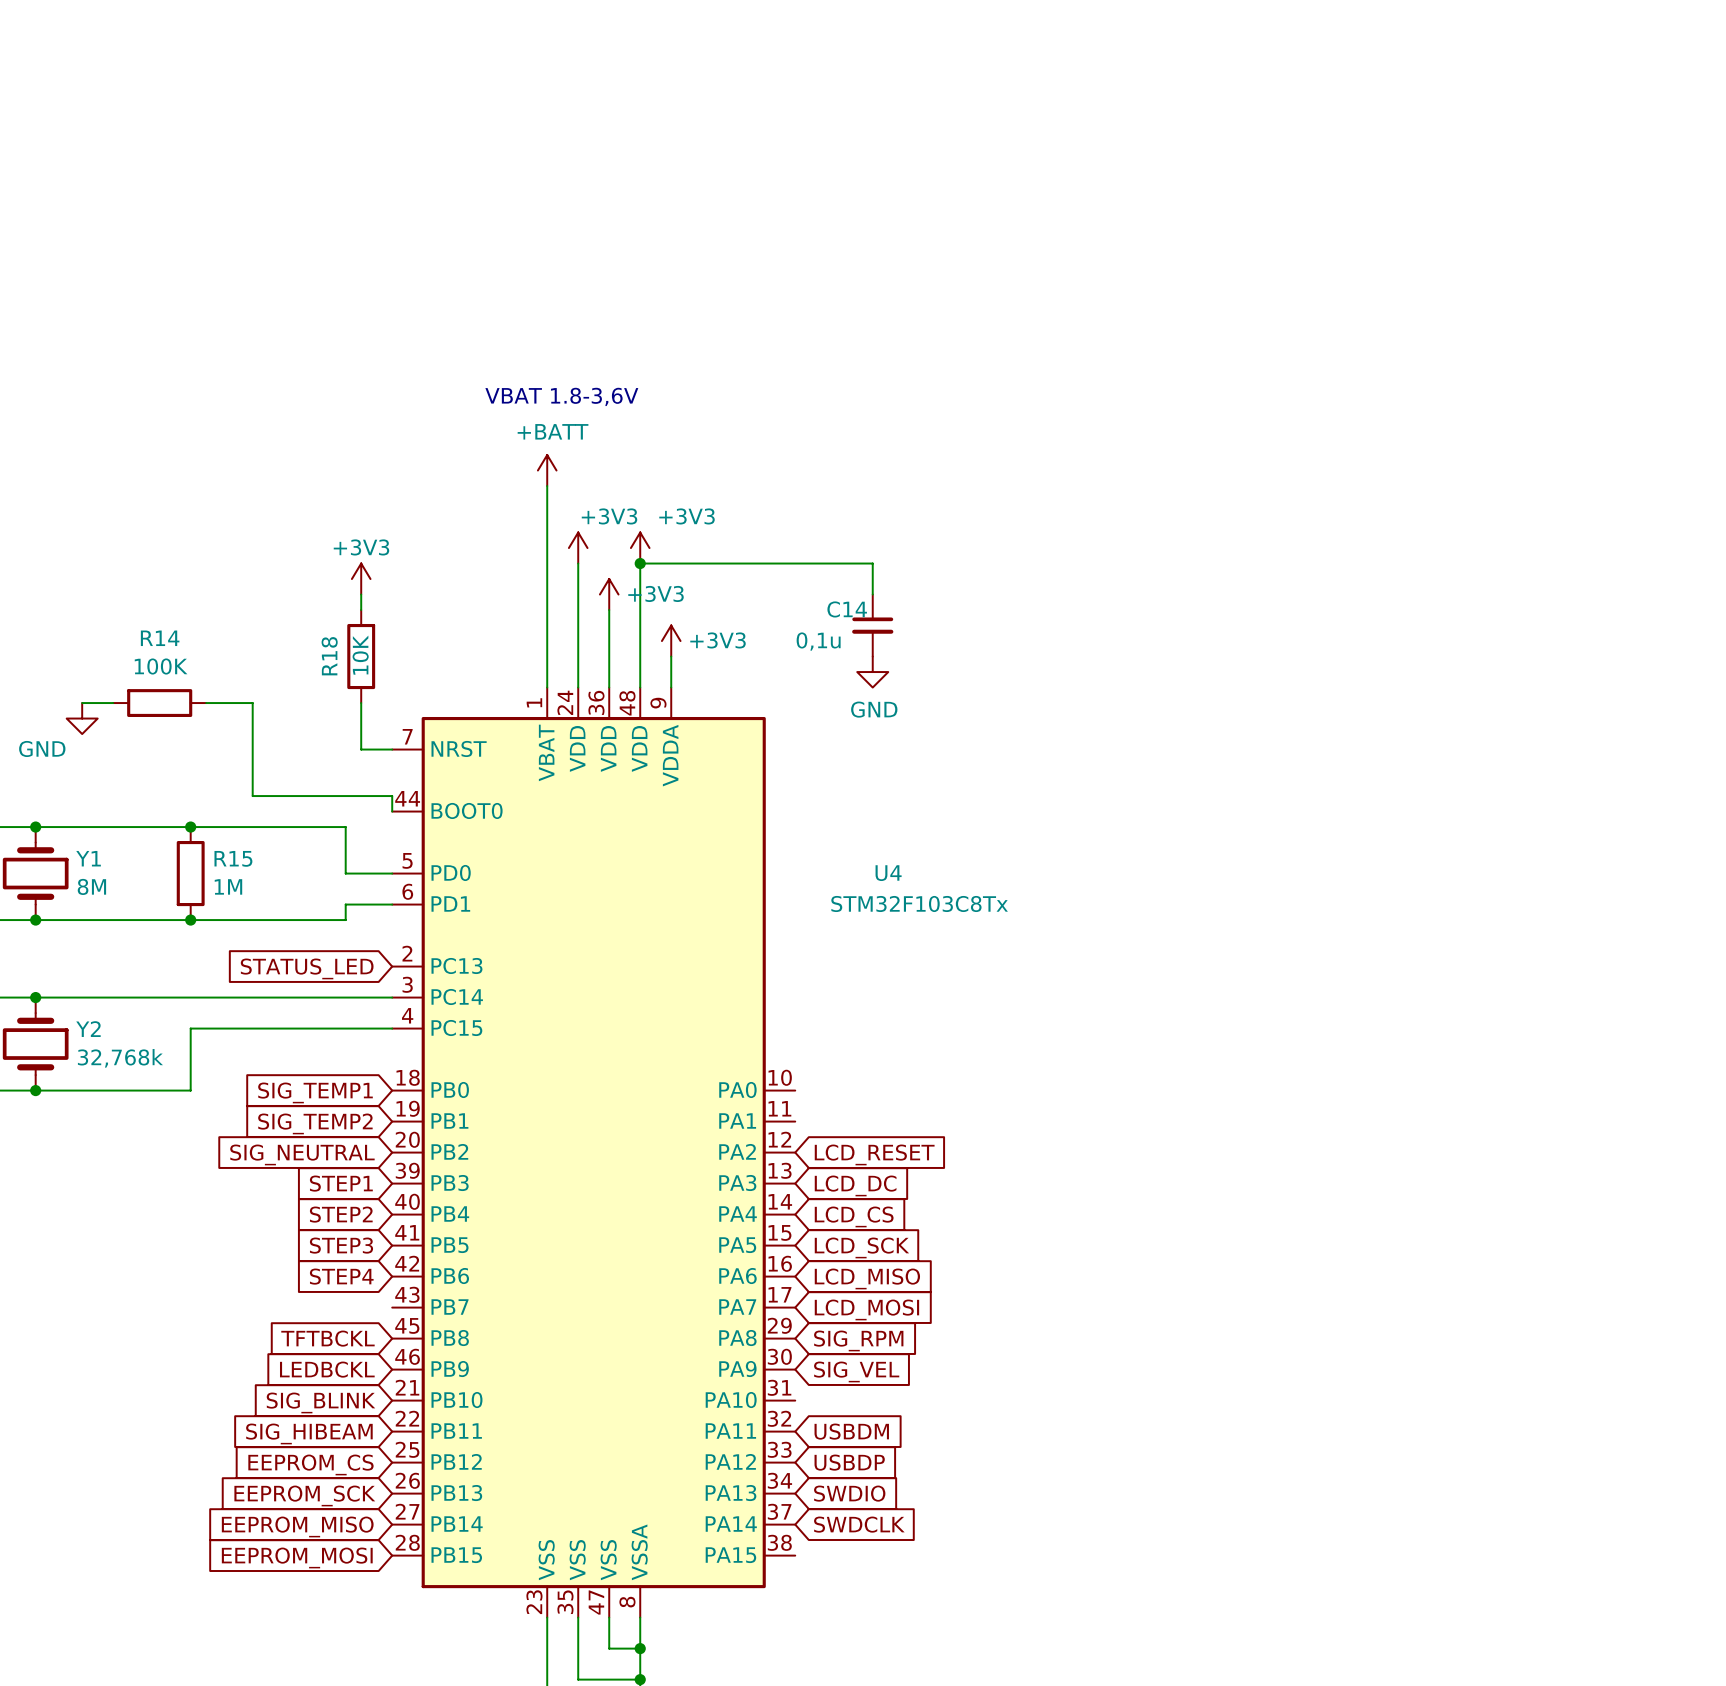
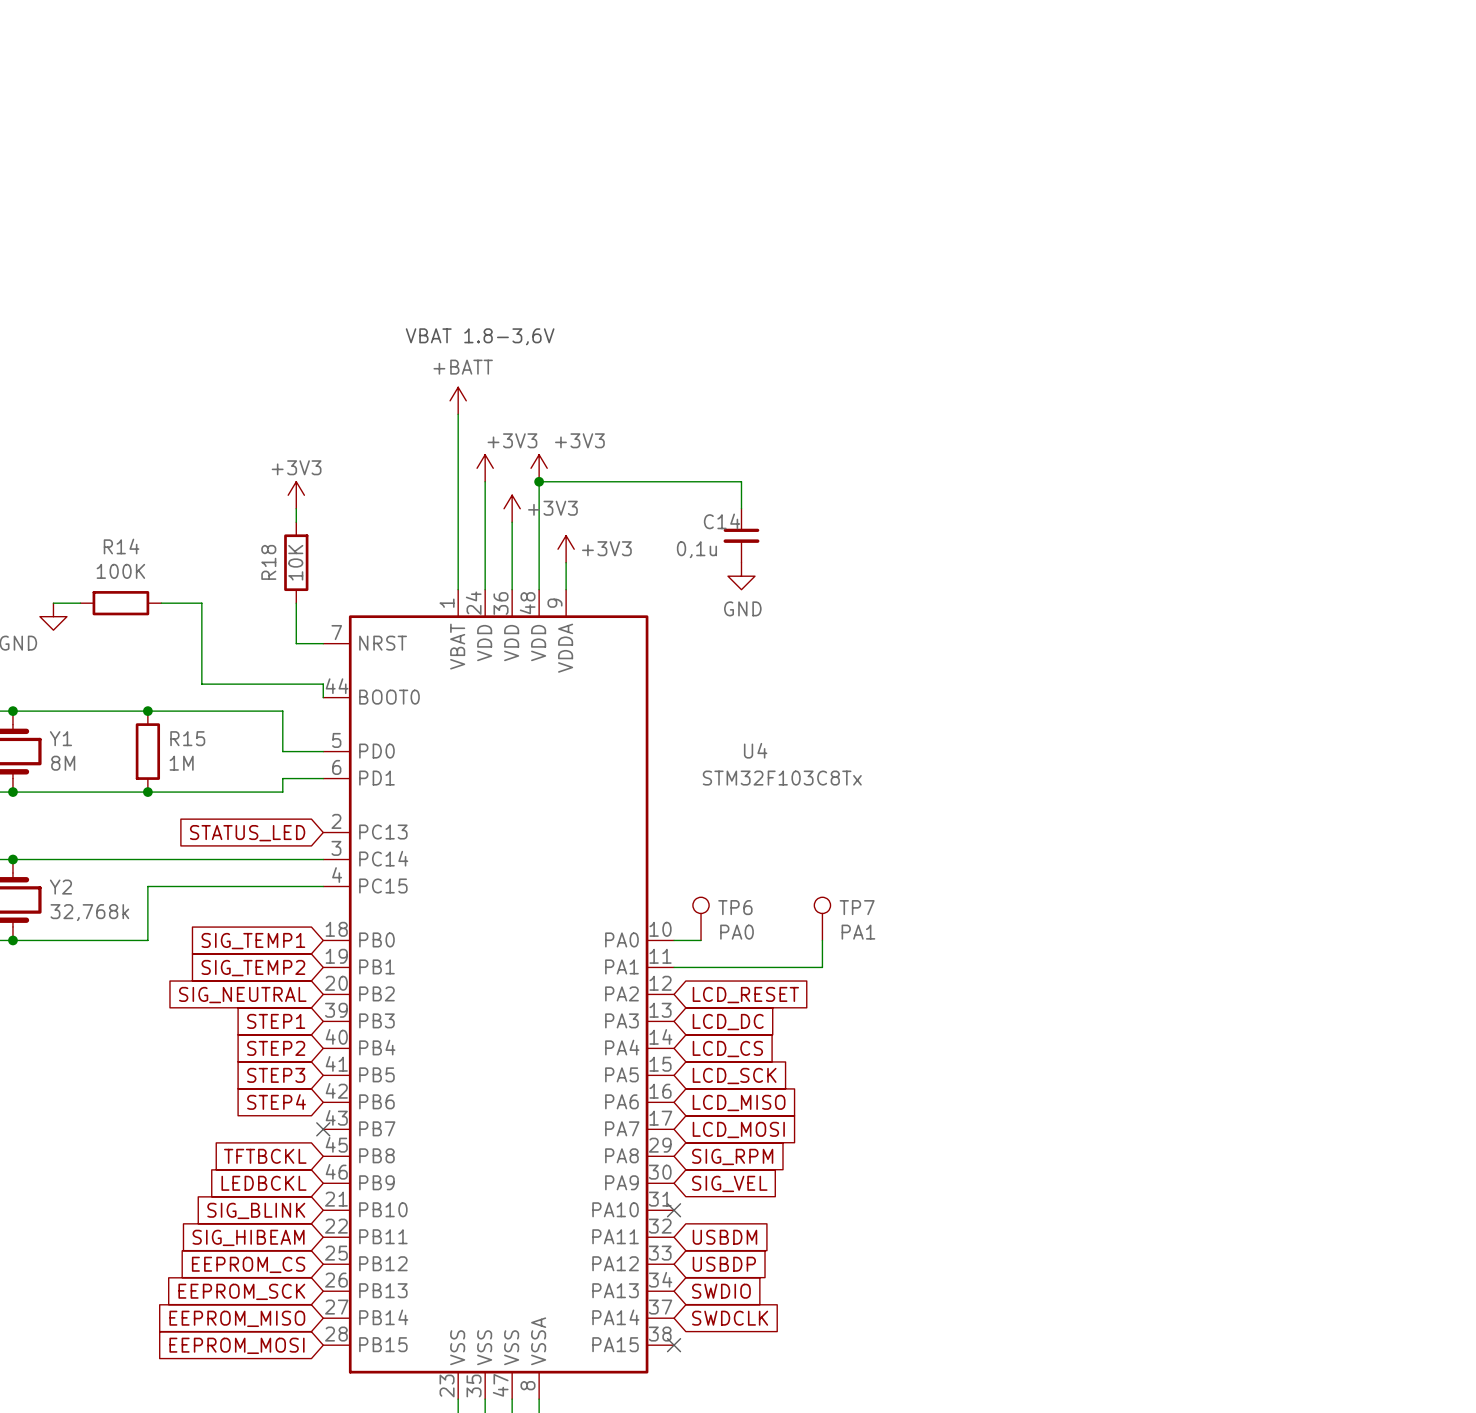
TP6: none -> PA0 (701, 918)
TP7: none -> PA1 (822, 918)
wire: none -> (674, 940) (701, 940)
wire: none -> (822, 940) (822, 967) (674, 967)
no-connect mark: none -> (323, 1129)
no-connect mark: none -> (674, 1210)
no-connect mark: none -> (674, 1345)

